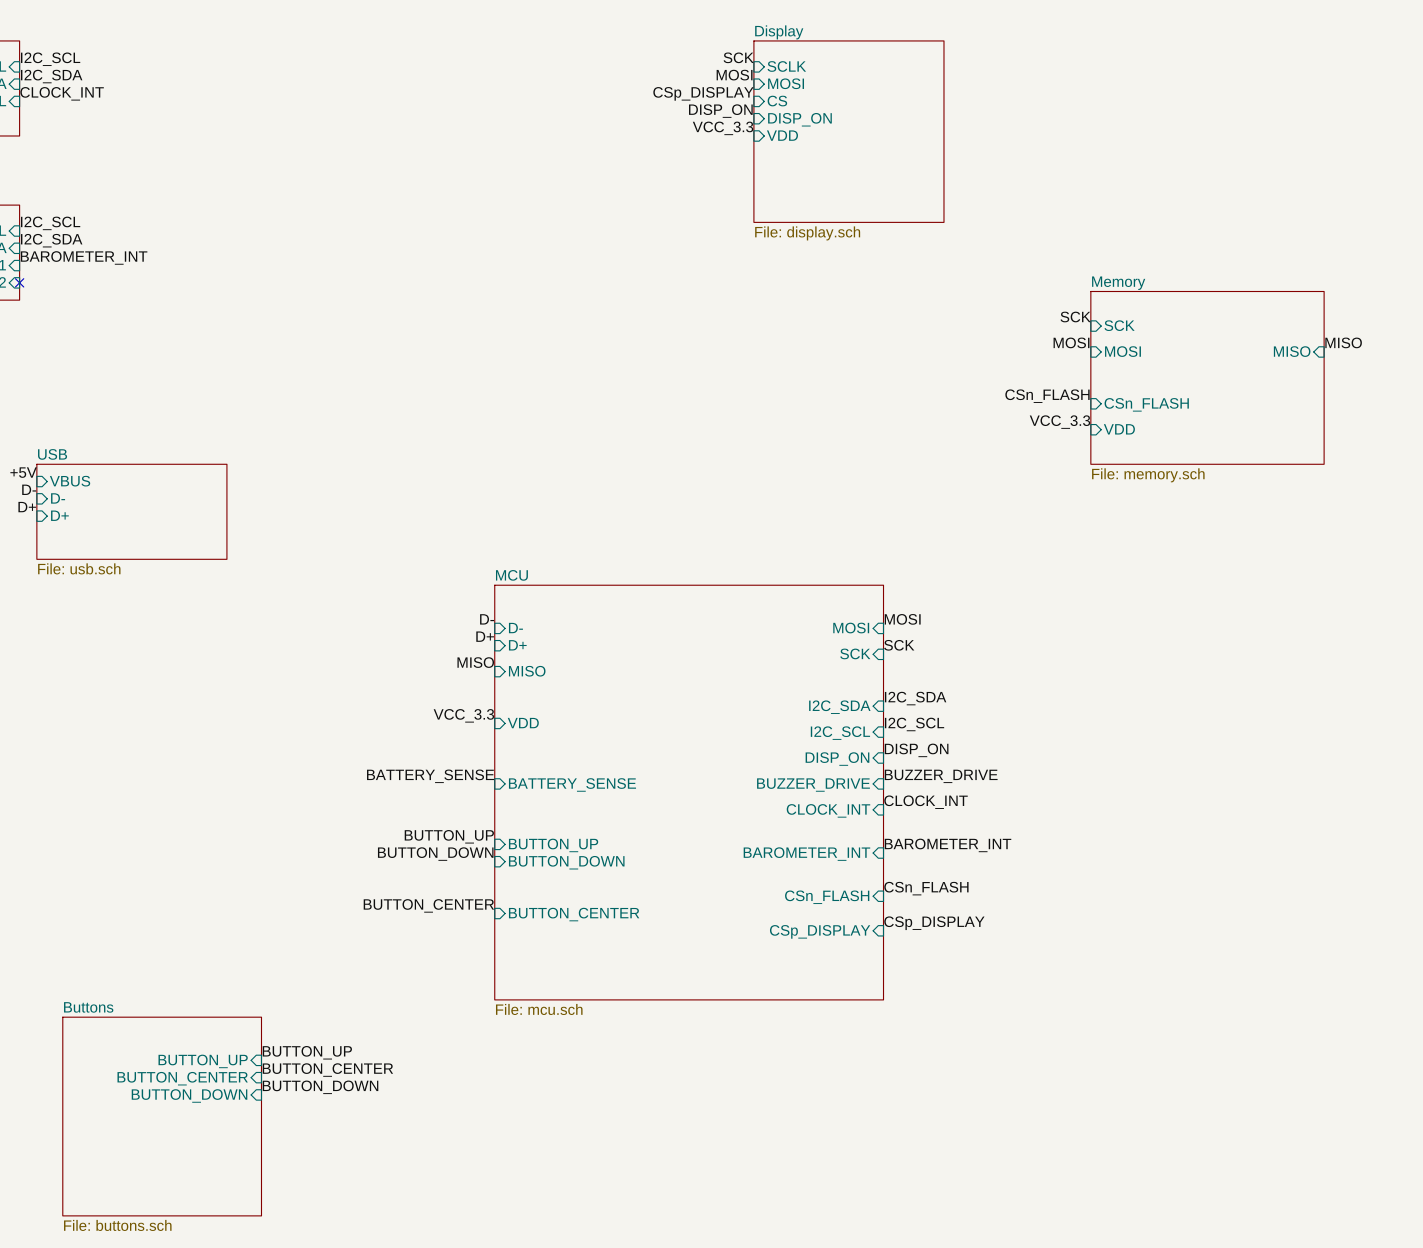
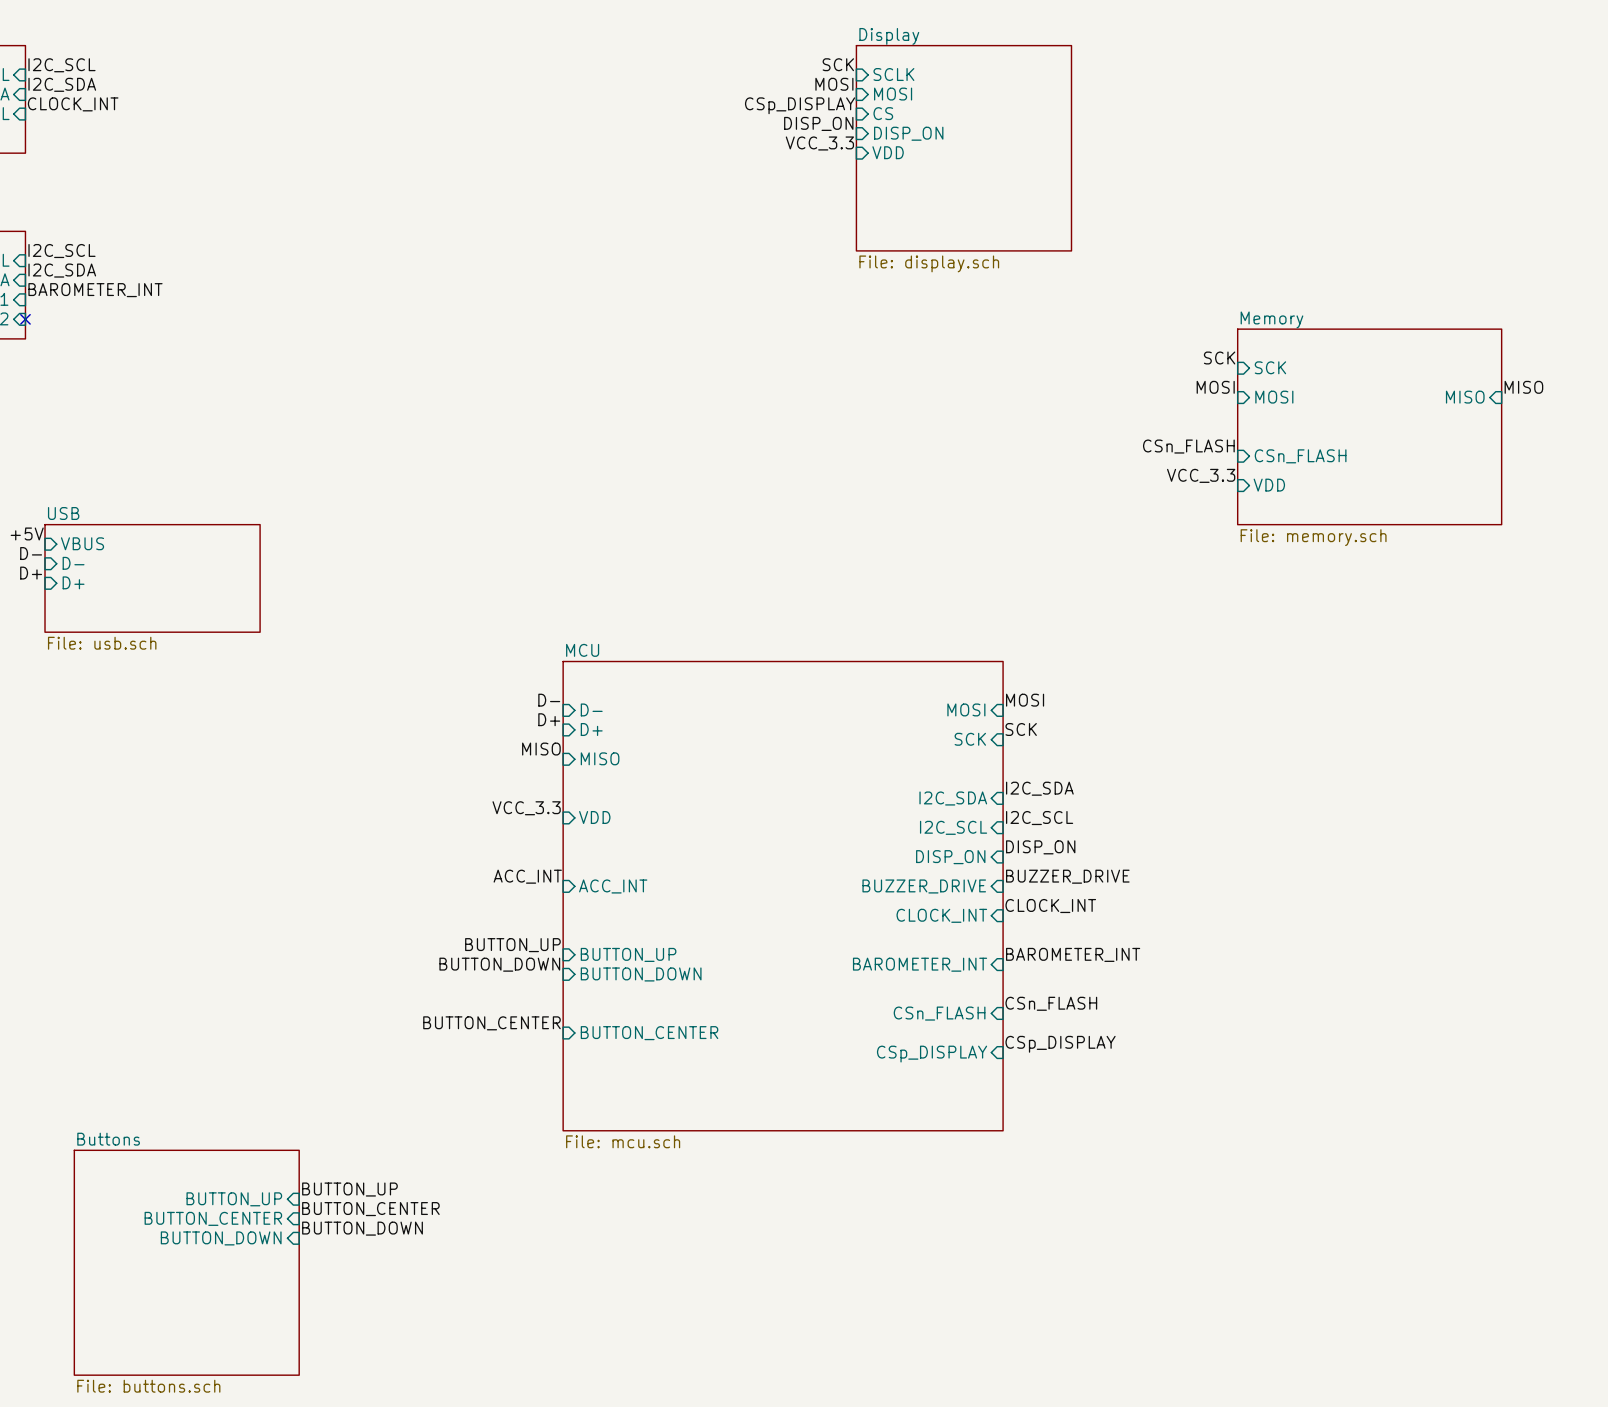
label: BATTERY_SENSE (430, 776) -> ACC_INT (527, 876)
sheet pin: BATTERY_SENSE (572, 784) -> ACC_INT (613, 886)

